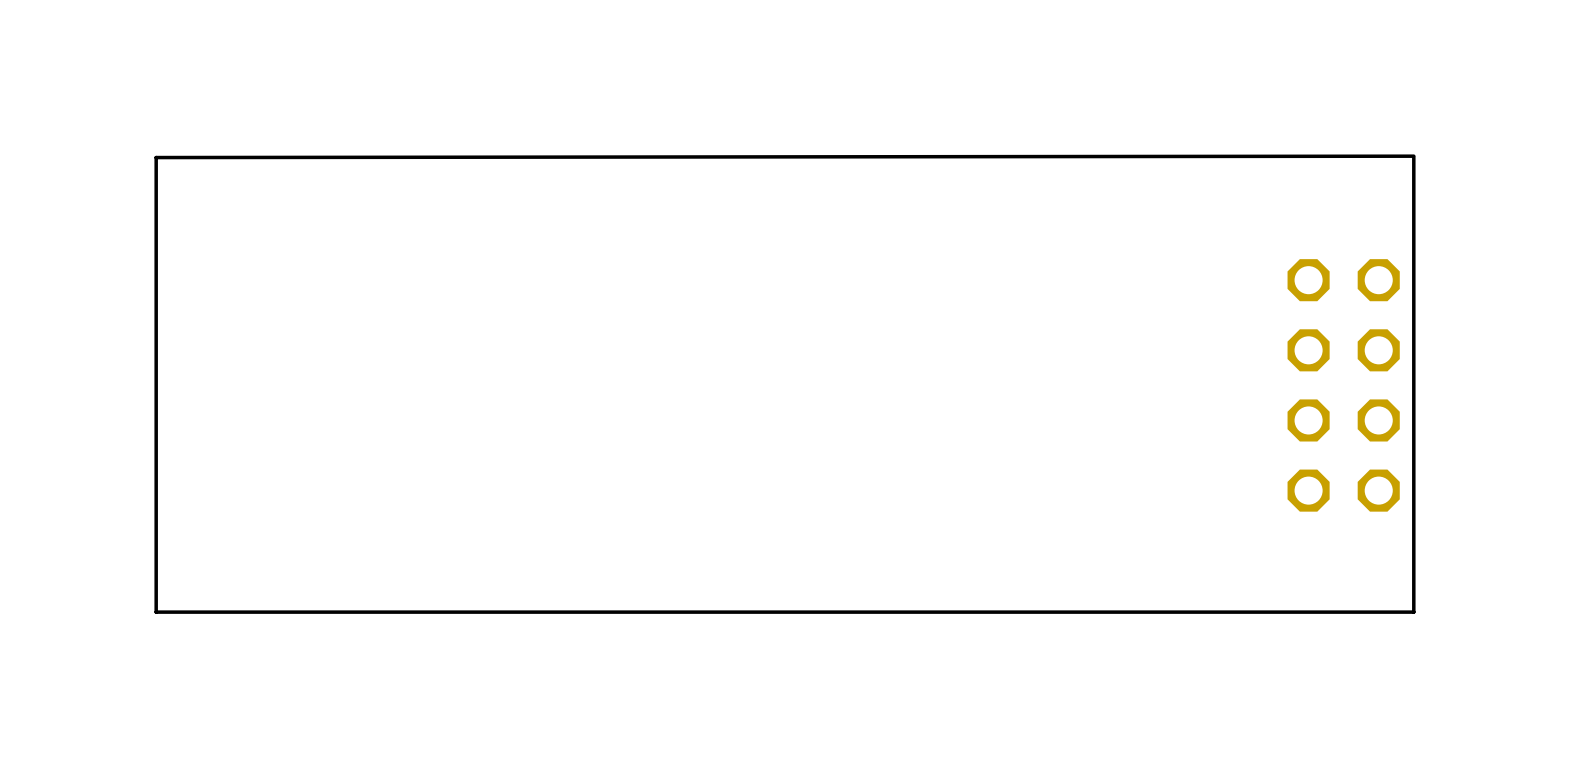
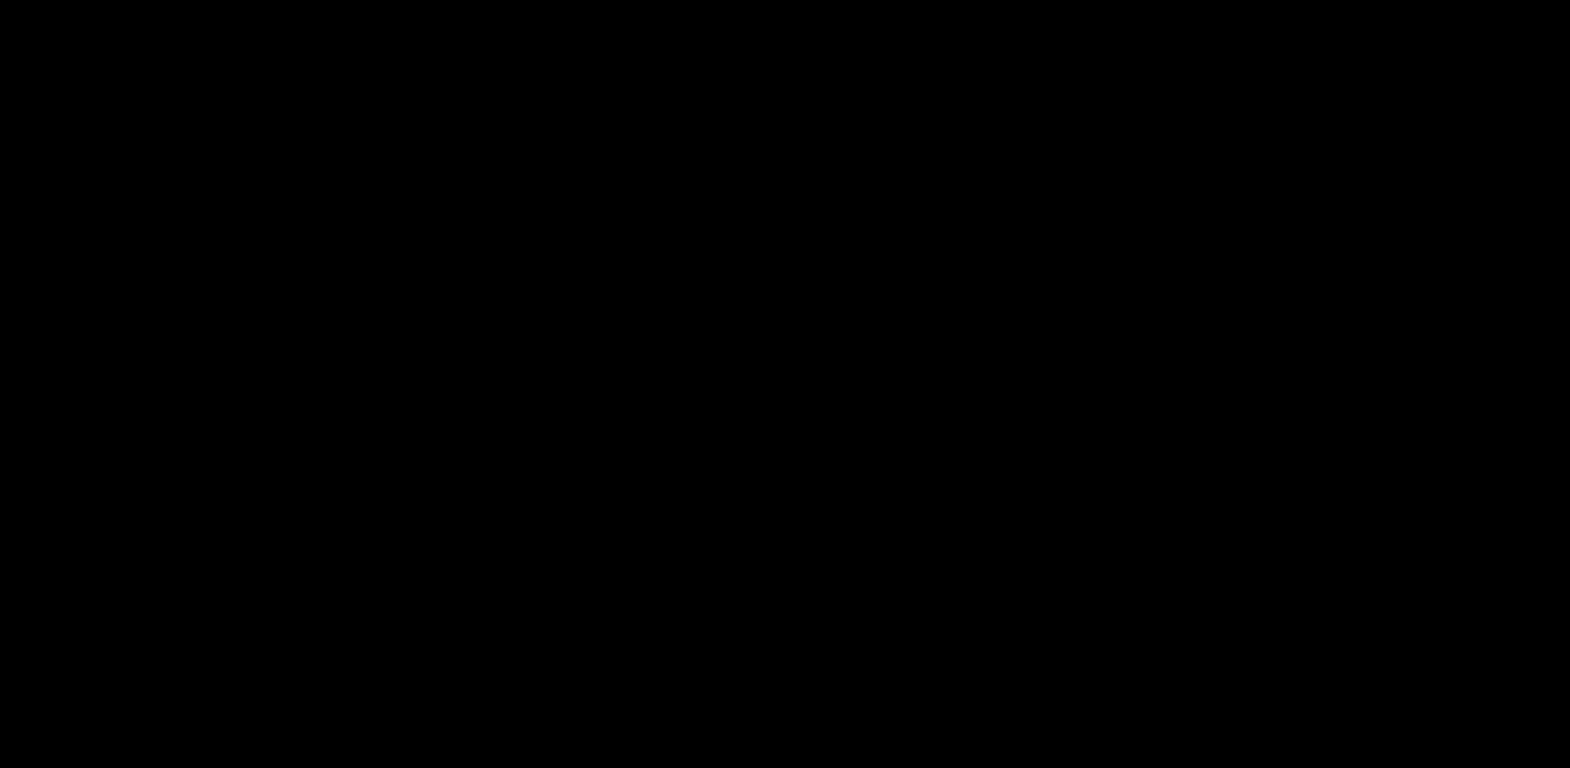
part: (784, 384) -> none

